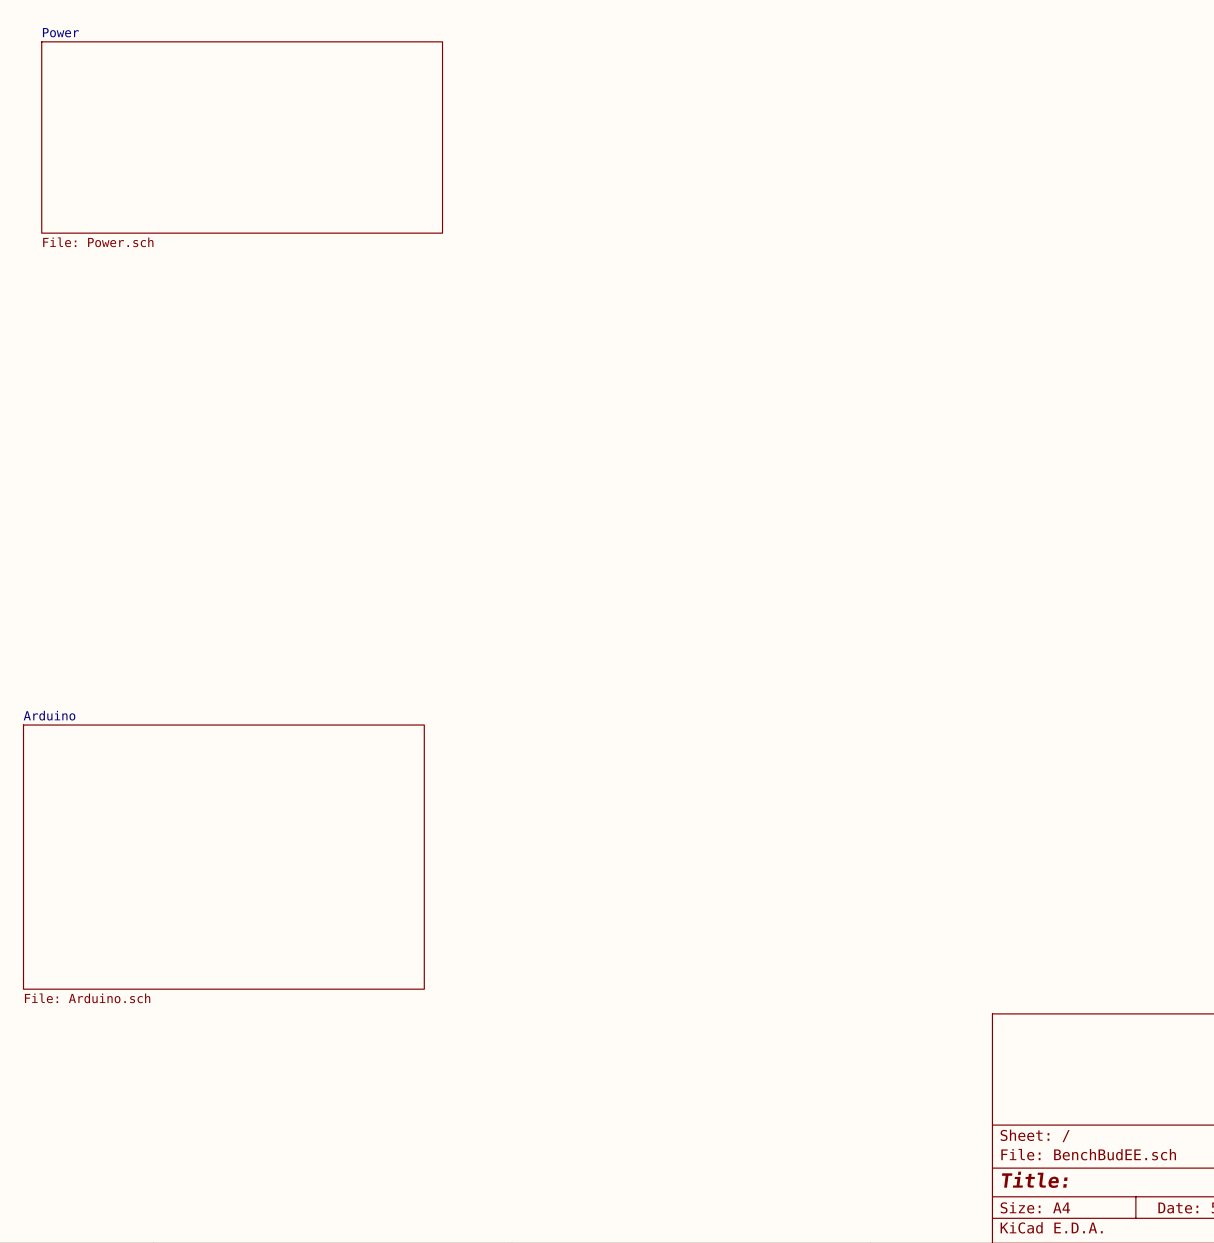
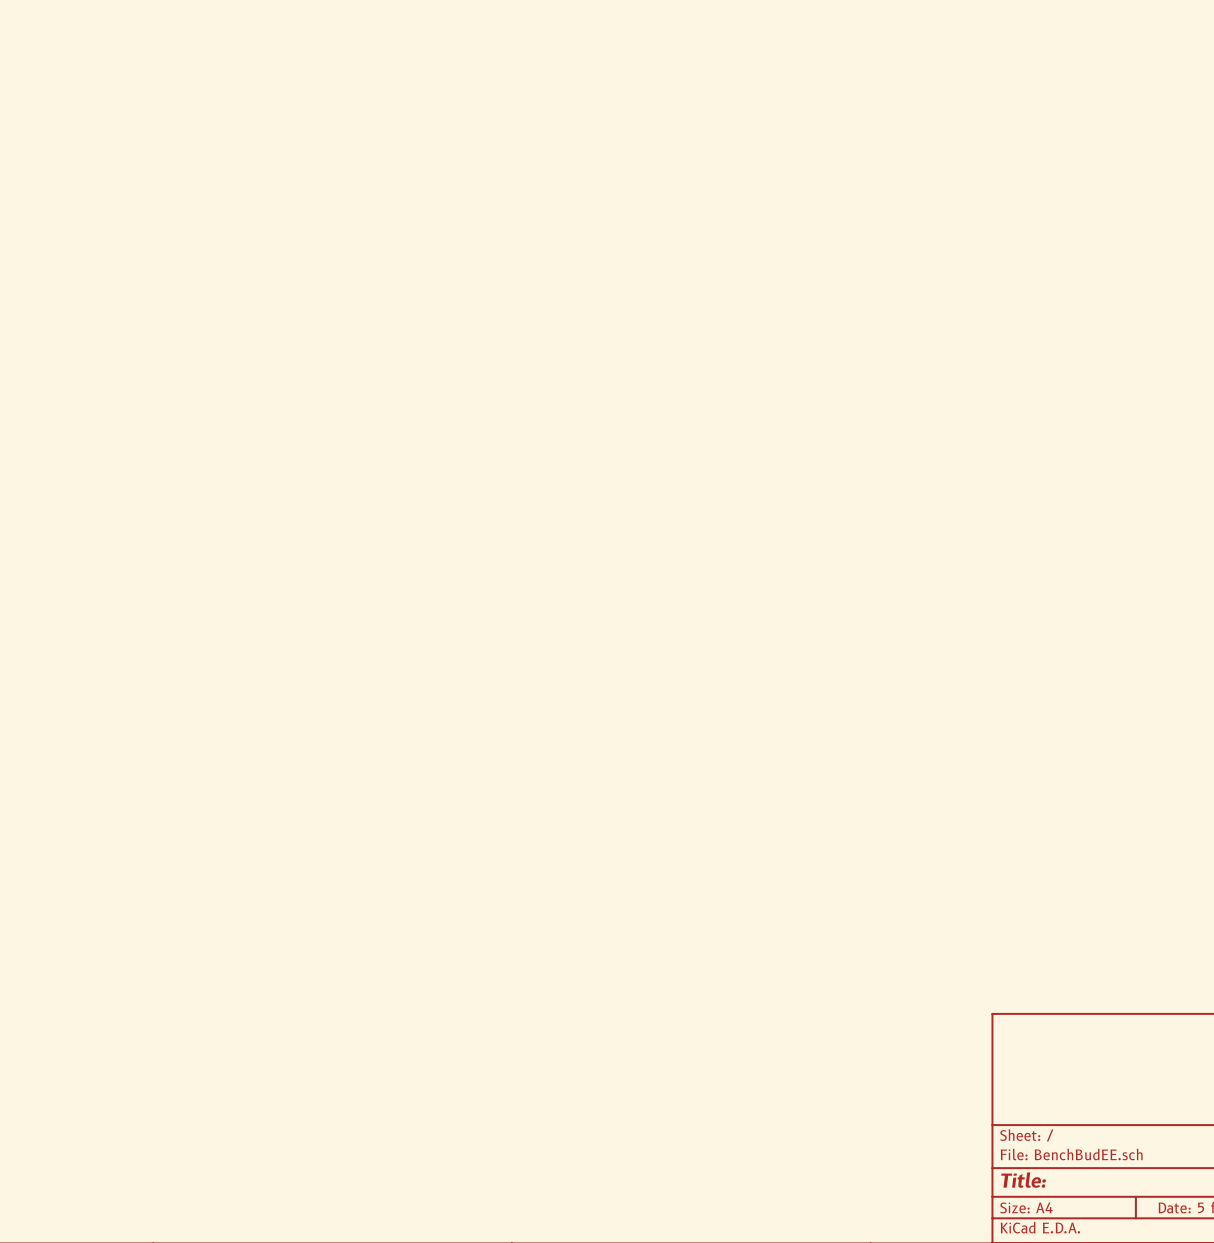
sheet Power: File: Power.sch (242, 137) -> none
sheet Arduino: File: Arduino.sch (223, 857) -> none

